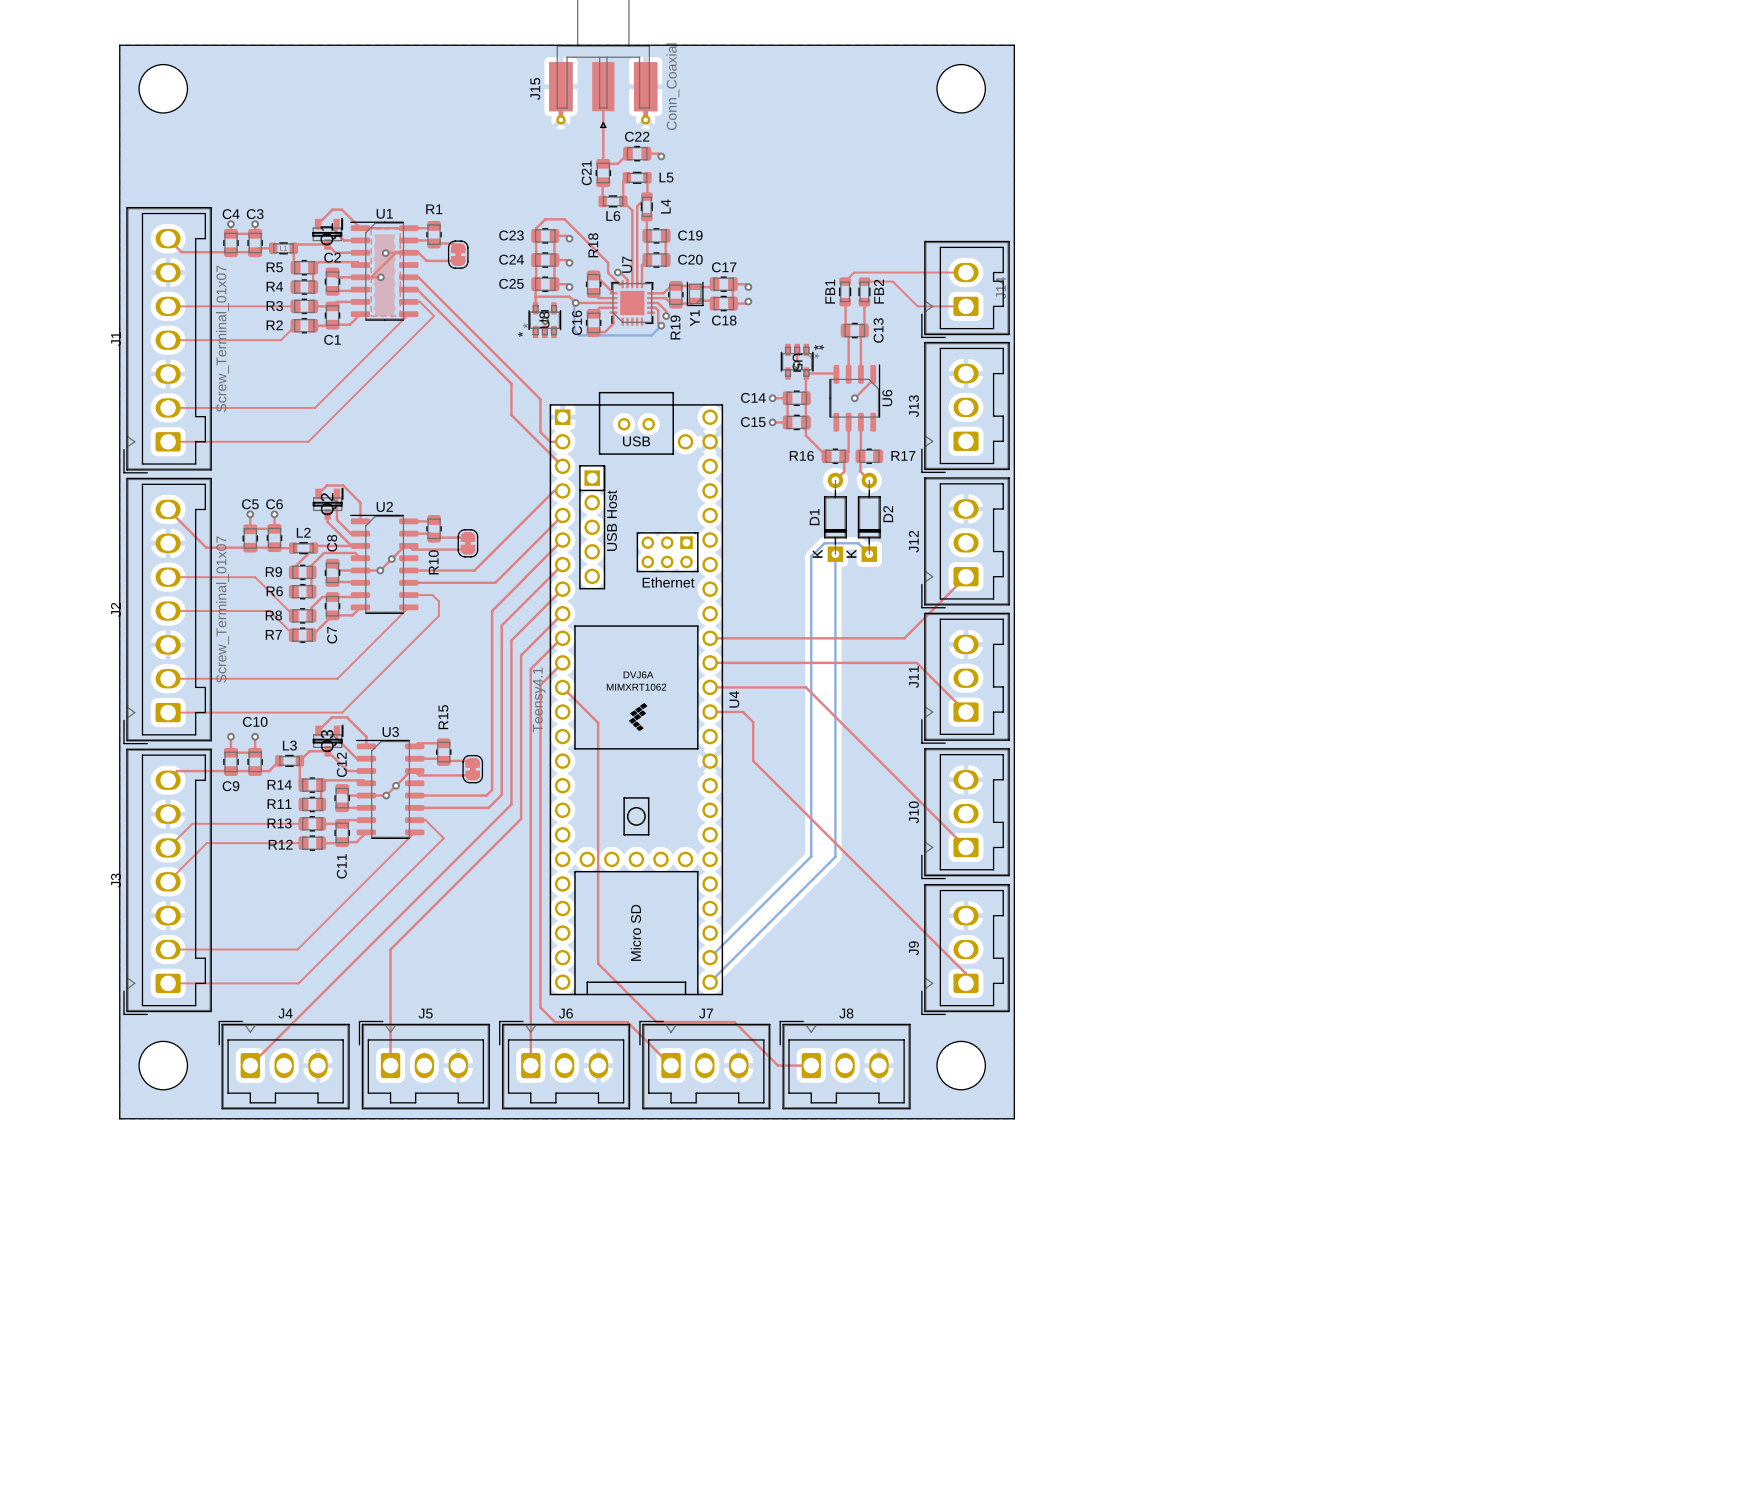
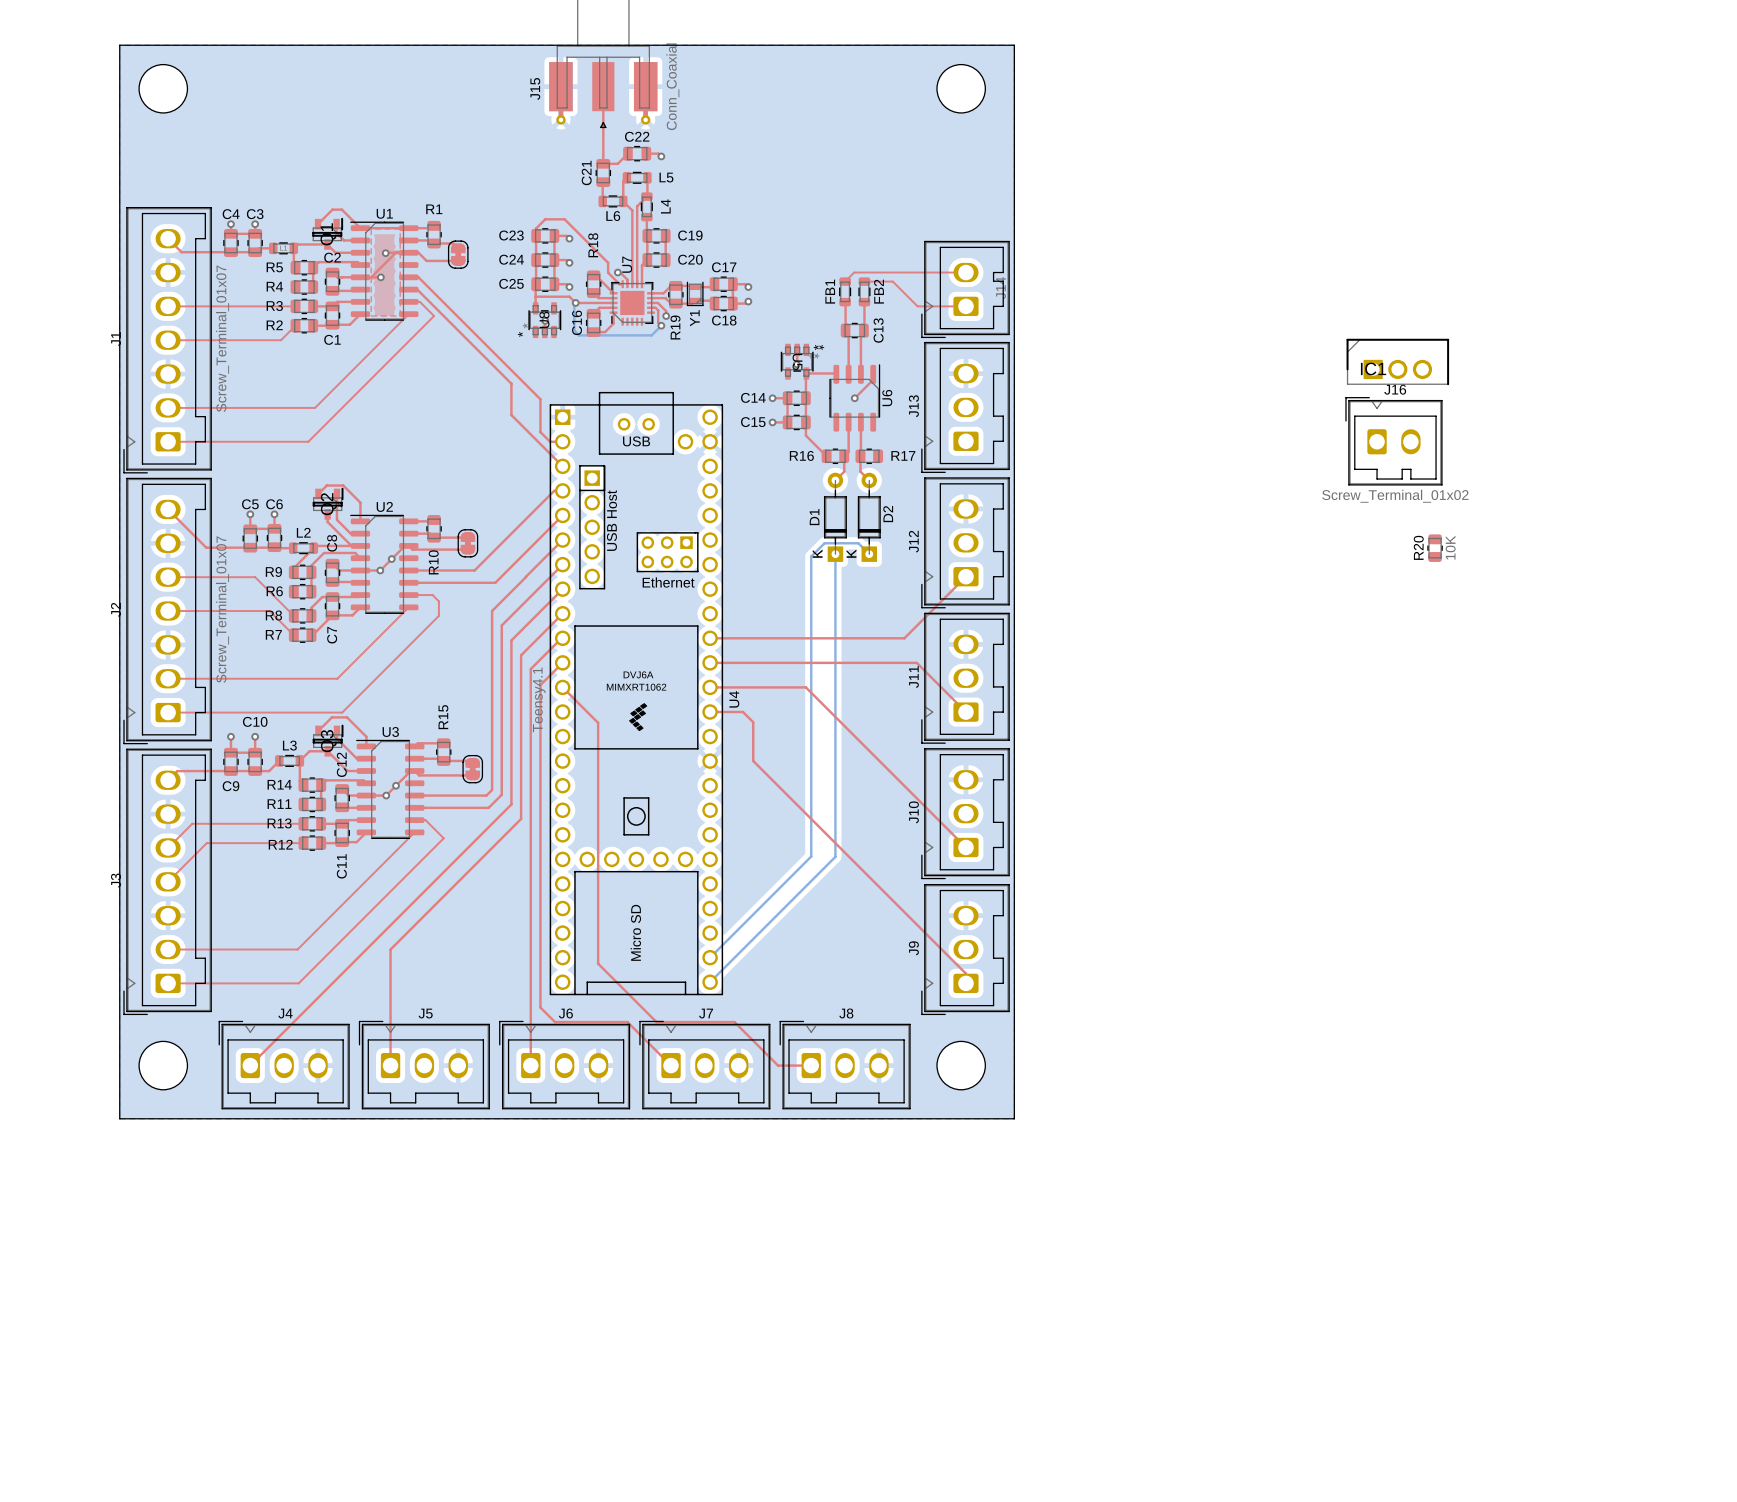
IC1: none -> (1397, 361)
J16: none -> Screw_Terminal_01x02 (1393, 441)
R20: none -> 10K (1435, 548)

